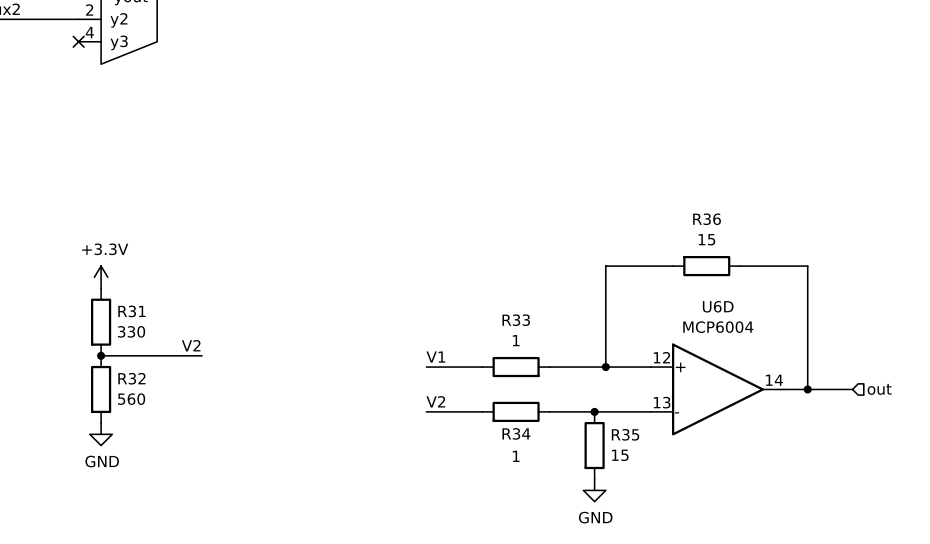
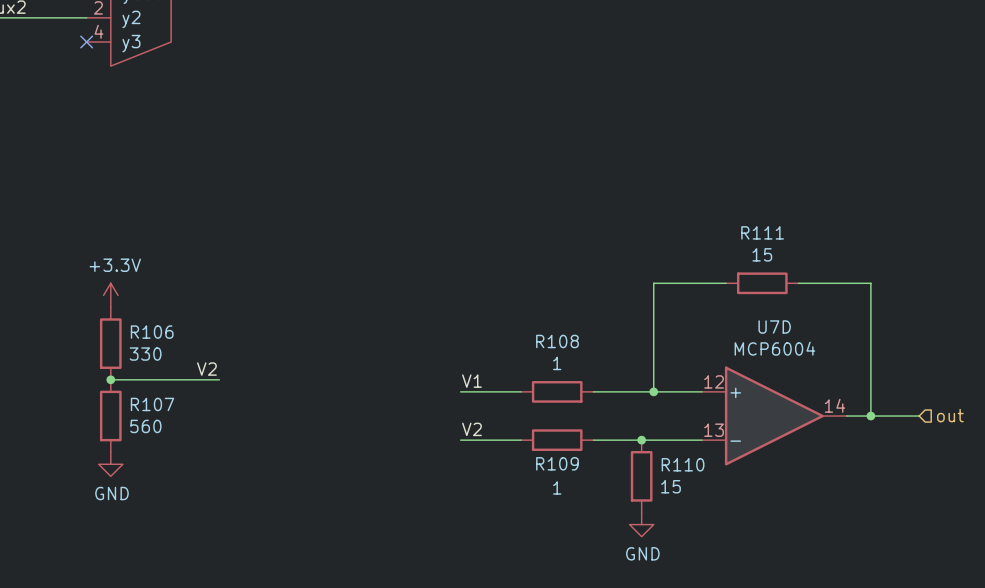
R36 name: R36 (707, 219) -> R111 (762, 232)
U6D name: U6D (718, 306) -> U7D (774, 327)
R31 name: R31 (131, 311) -> R106 (152, 332)
R33 name: R33 (516, 320) -> R108 (557, 341)
R32 name: R32 (131, 378) -> R107 (152, 404)
R34 name: R34 (516, 433) -> R109 (557, 463)
R35 name: R35 (625, 434) -> R110 (683, 464)

